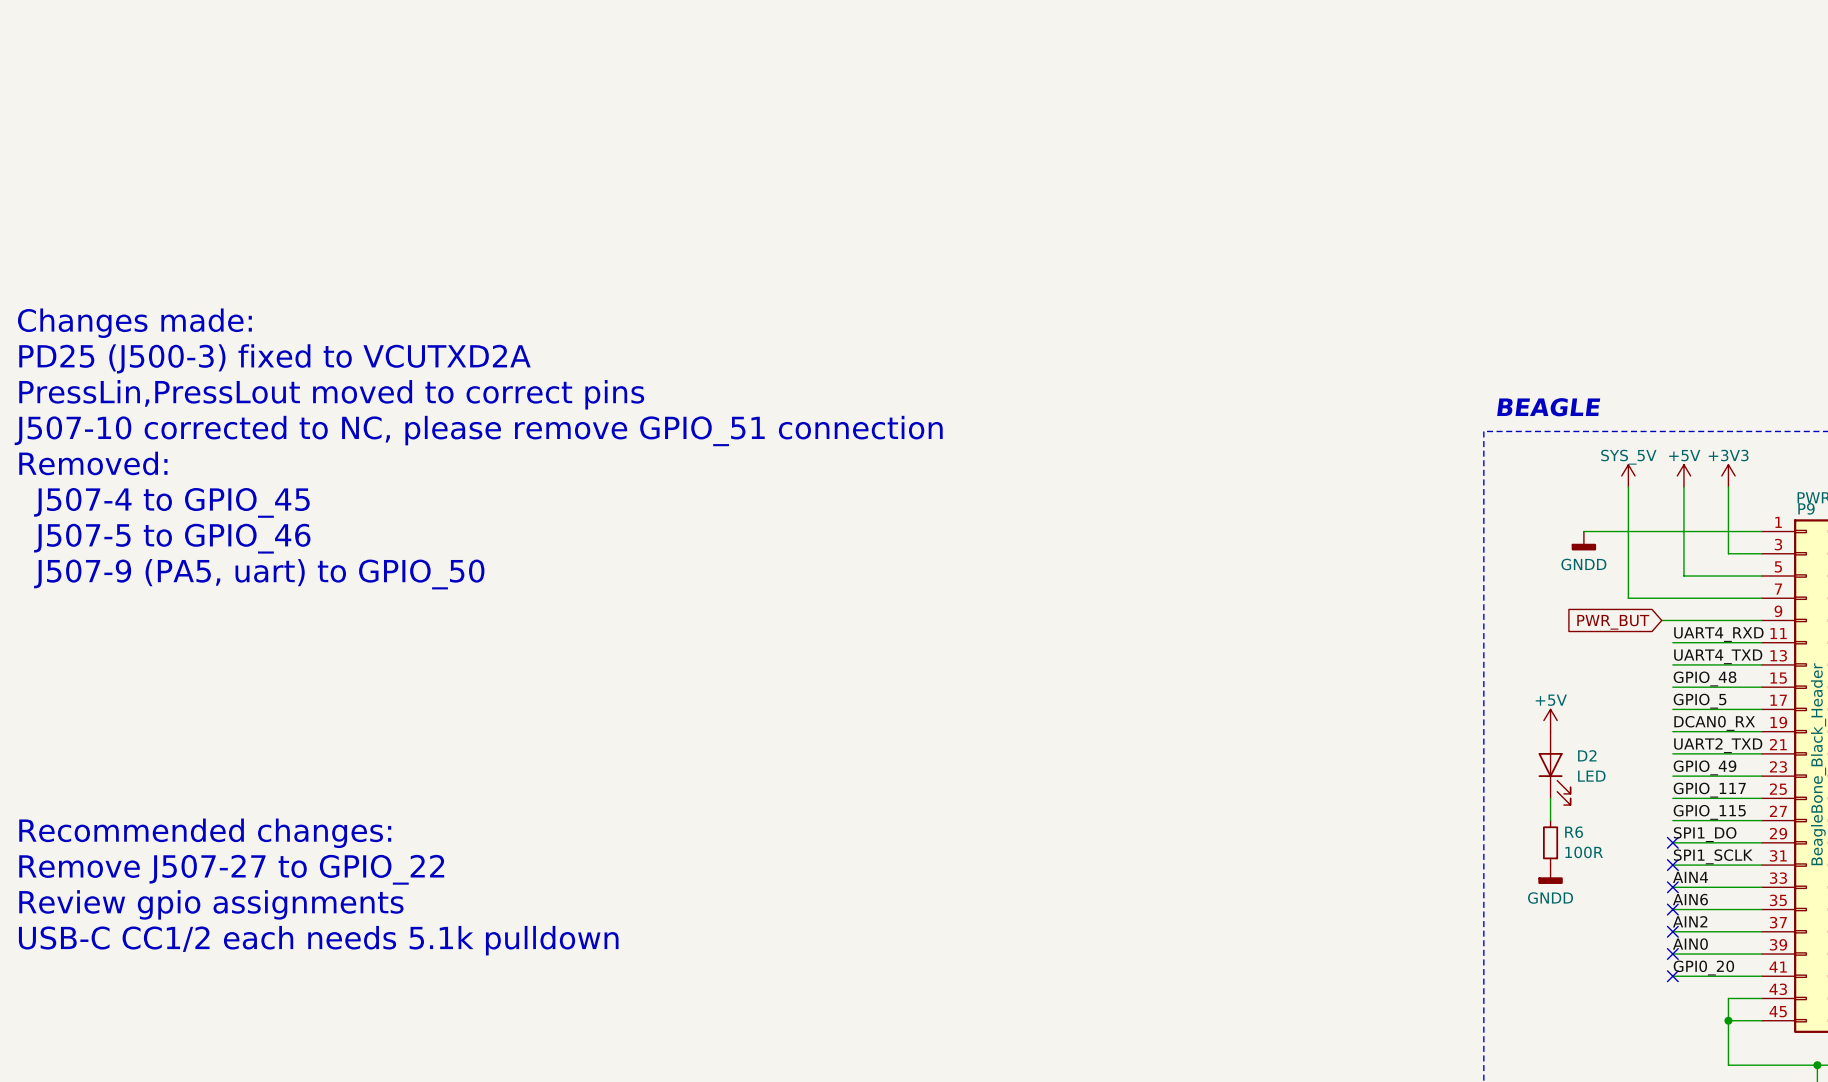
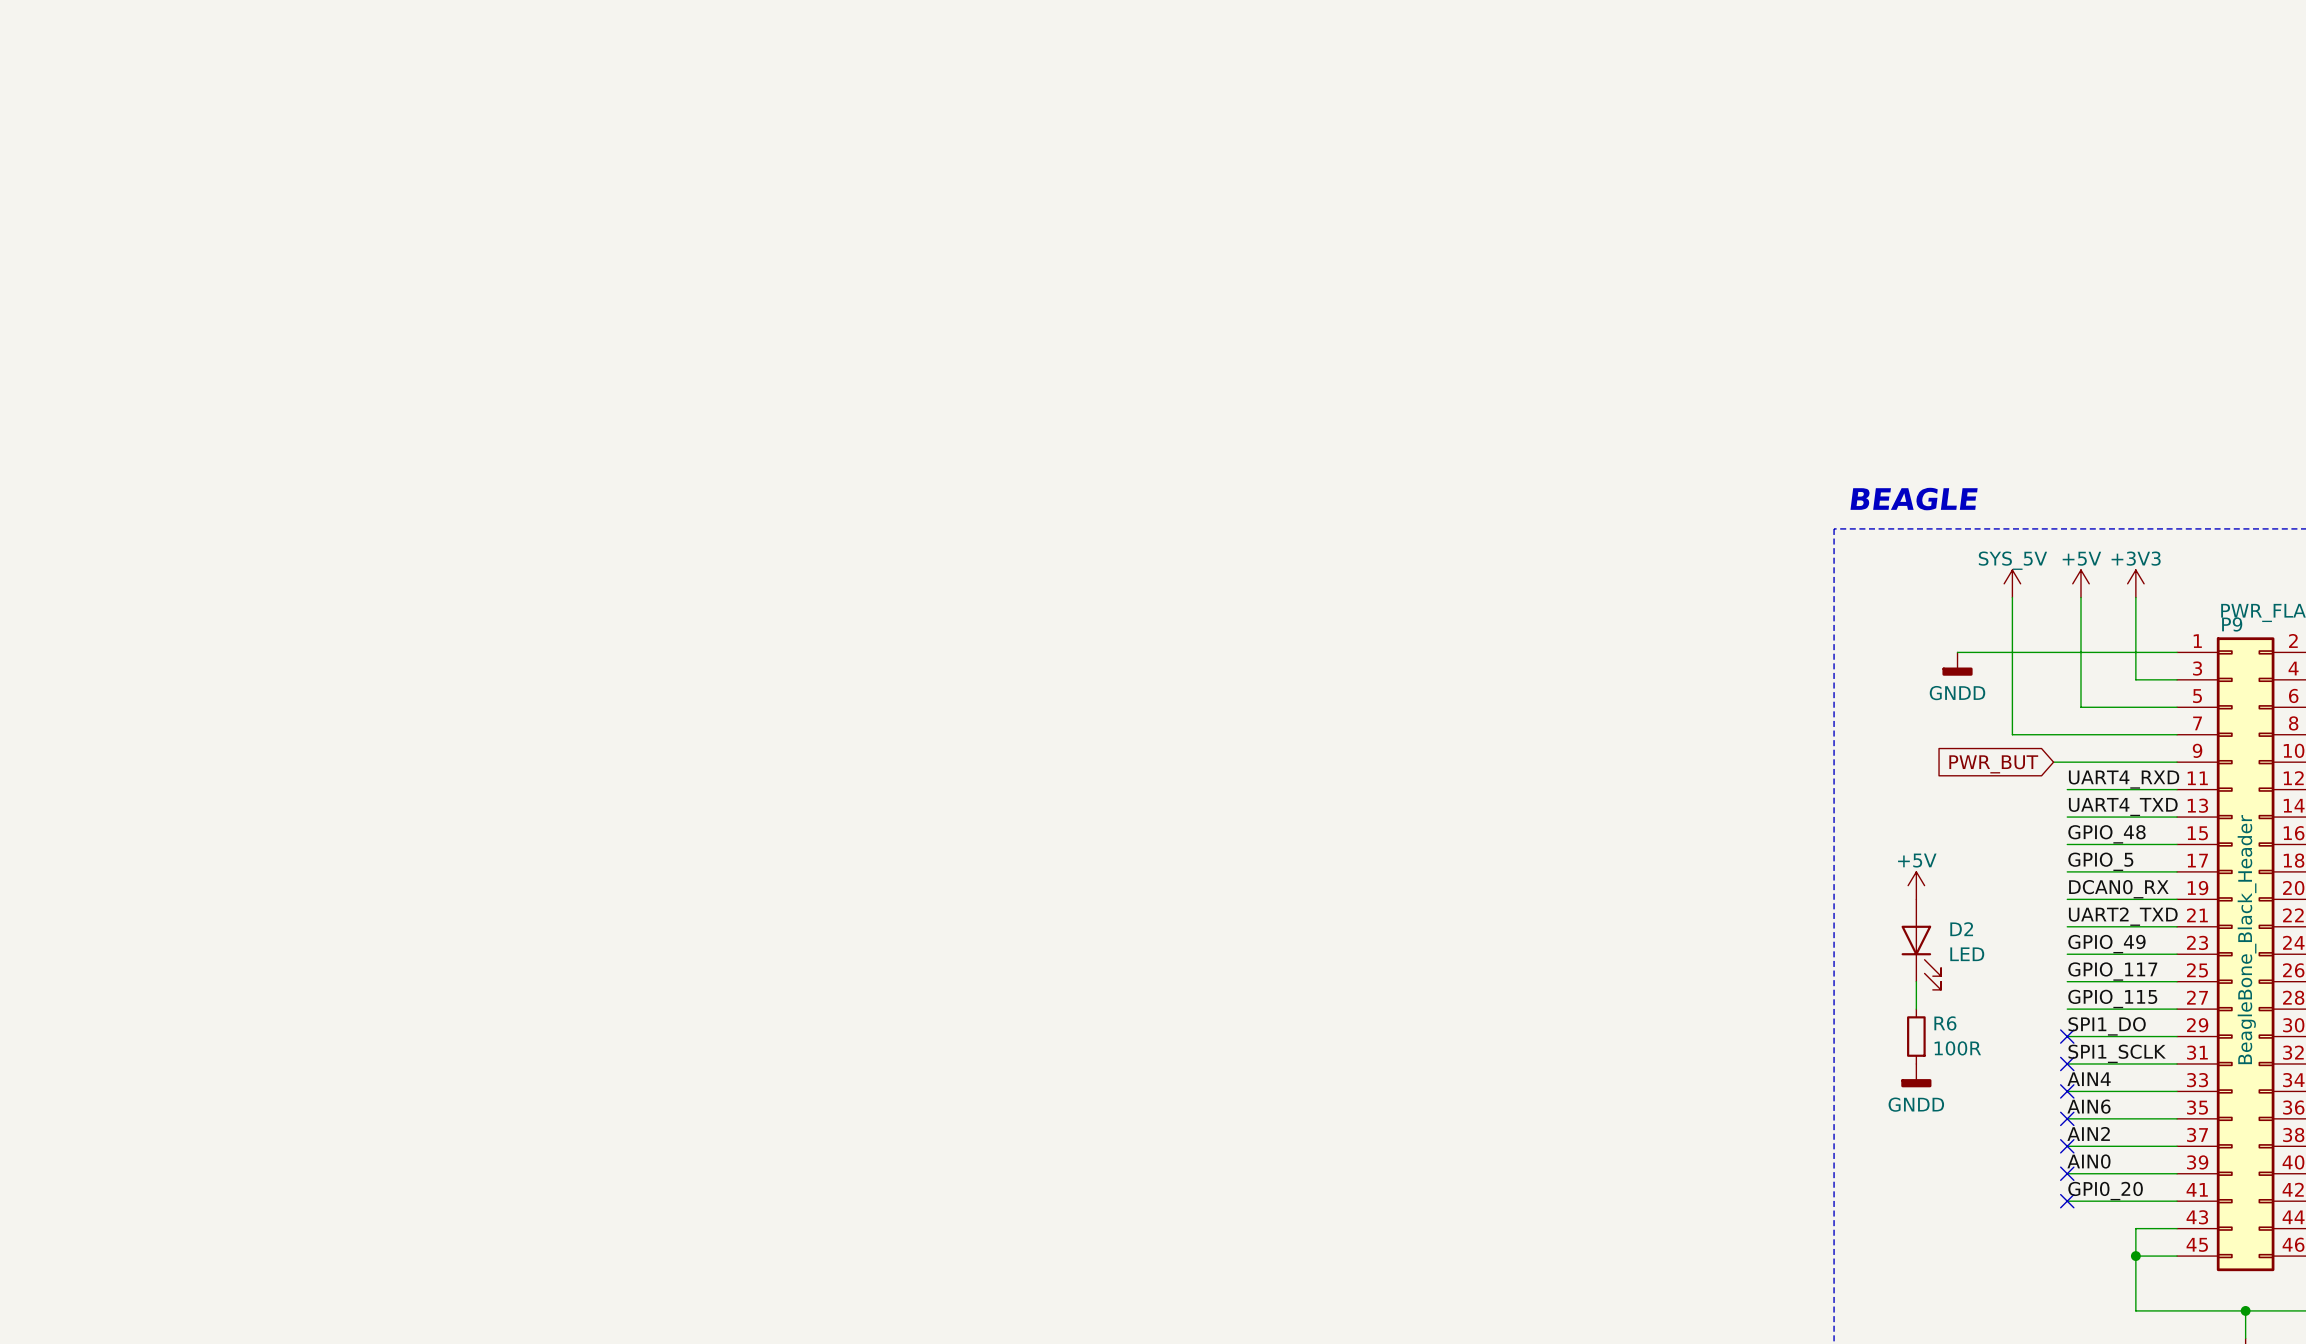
text: Changes made: (134, 323) -> none
text: PD25 (J500-3) fixed to VCUTXD2A (274, 358) -> none
text: PressLin,PressLout moved to correct pins (331, 394) -> none
text: J507-10 corrected to NC, please remove GPIO_51 connection (478, 431) -> none
text: Removed: (93, 463) -> none
text: J507-4 to GPIO_45 (171, 502) -> none
text: J507-5 to GPIO_46 (172, 538) -> none
text: J507-9 (PA5, uart) to GPIO_50 (259, 574) -> none
text: Recommended changes: (205, 833) -> none
text: Remove J507-27 to GPIO_22 (231, 869) -> none
text: Review gpio assignments (211, 904) -> none
text: USB-C CC1/2 each needs 5.1k pulldown (318, 940) -> none

